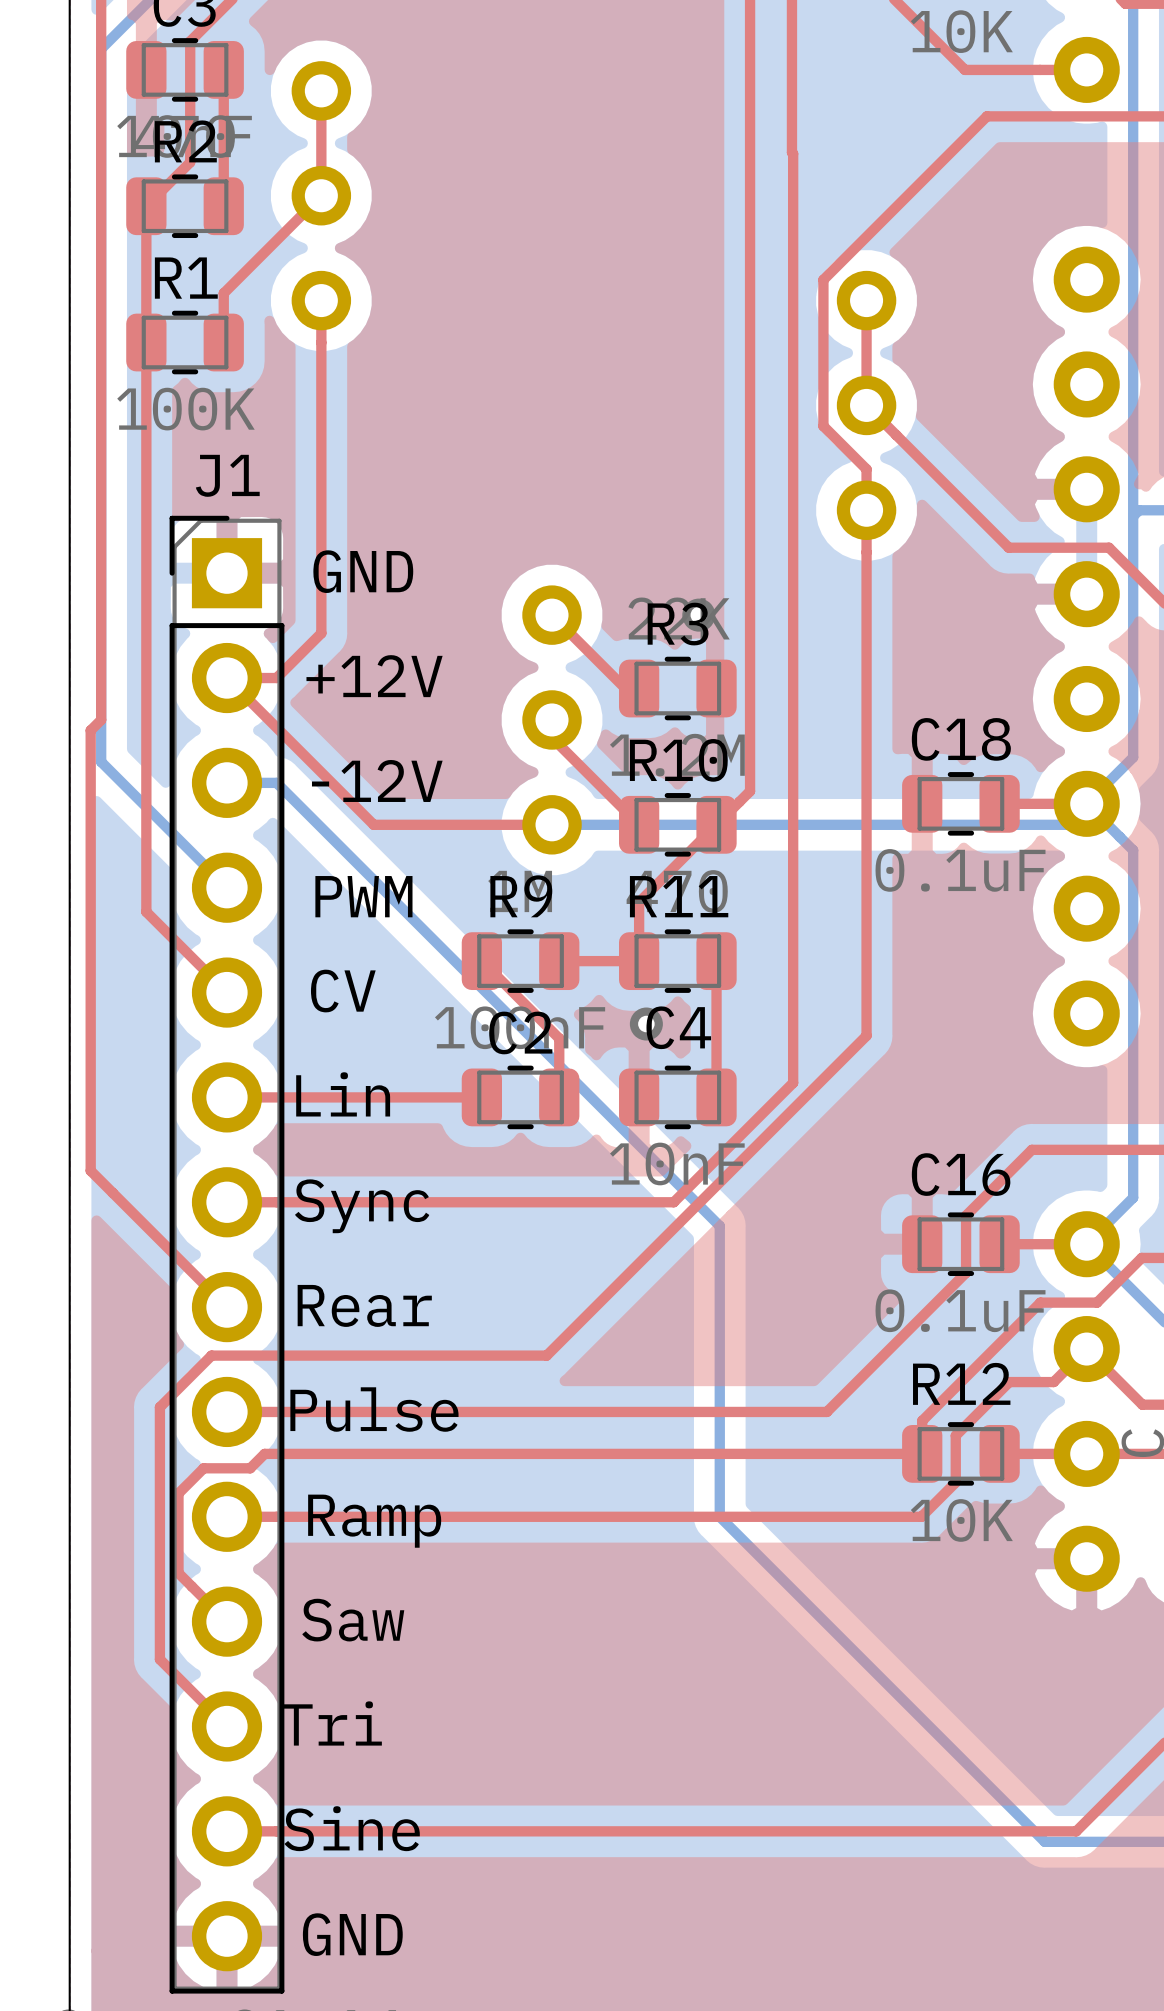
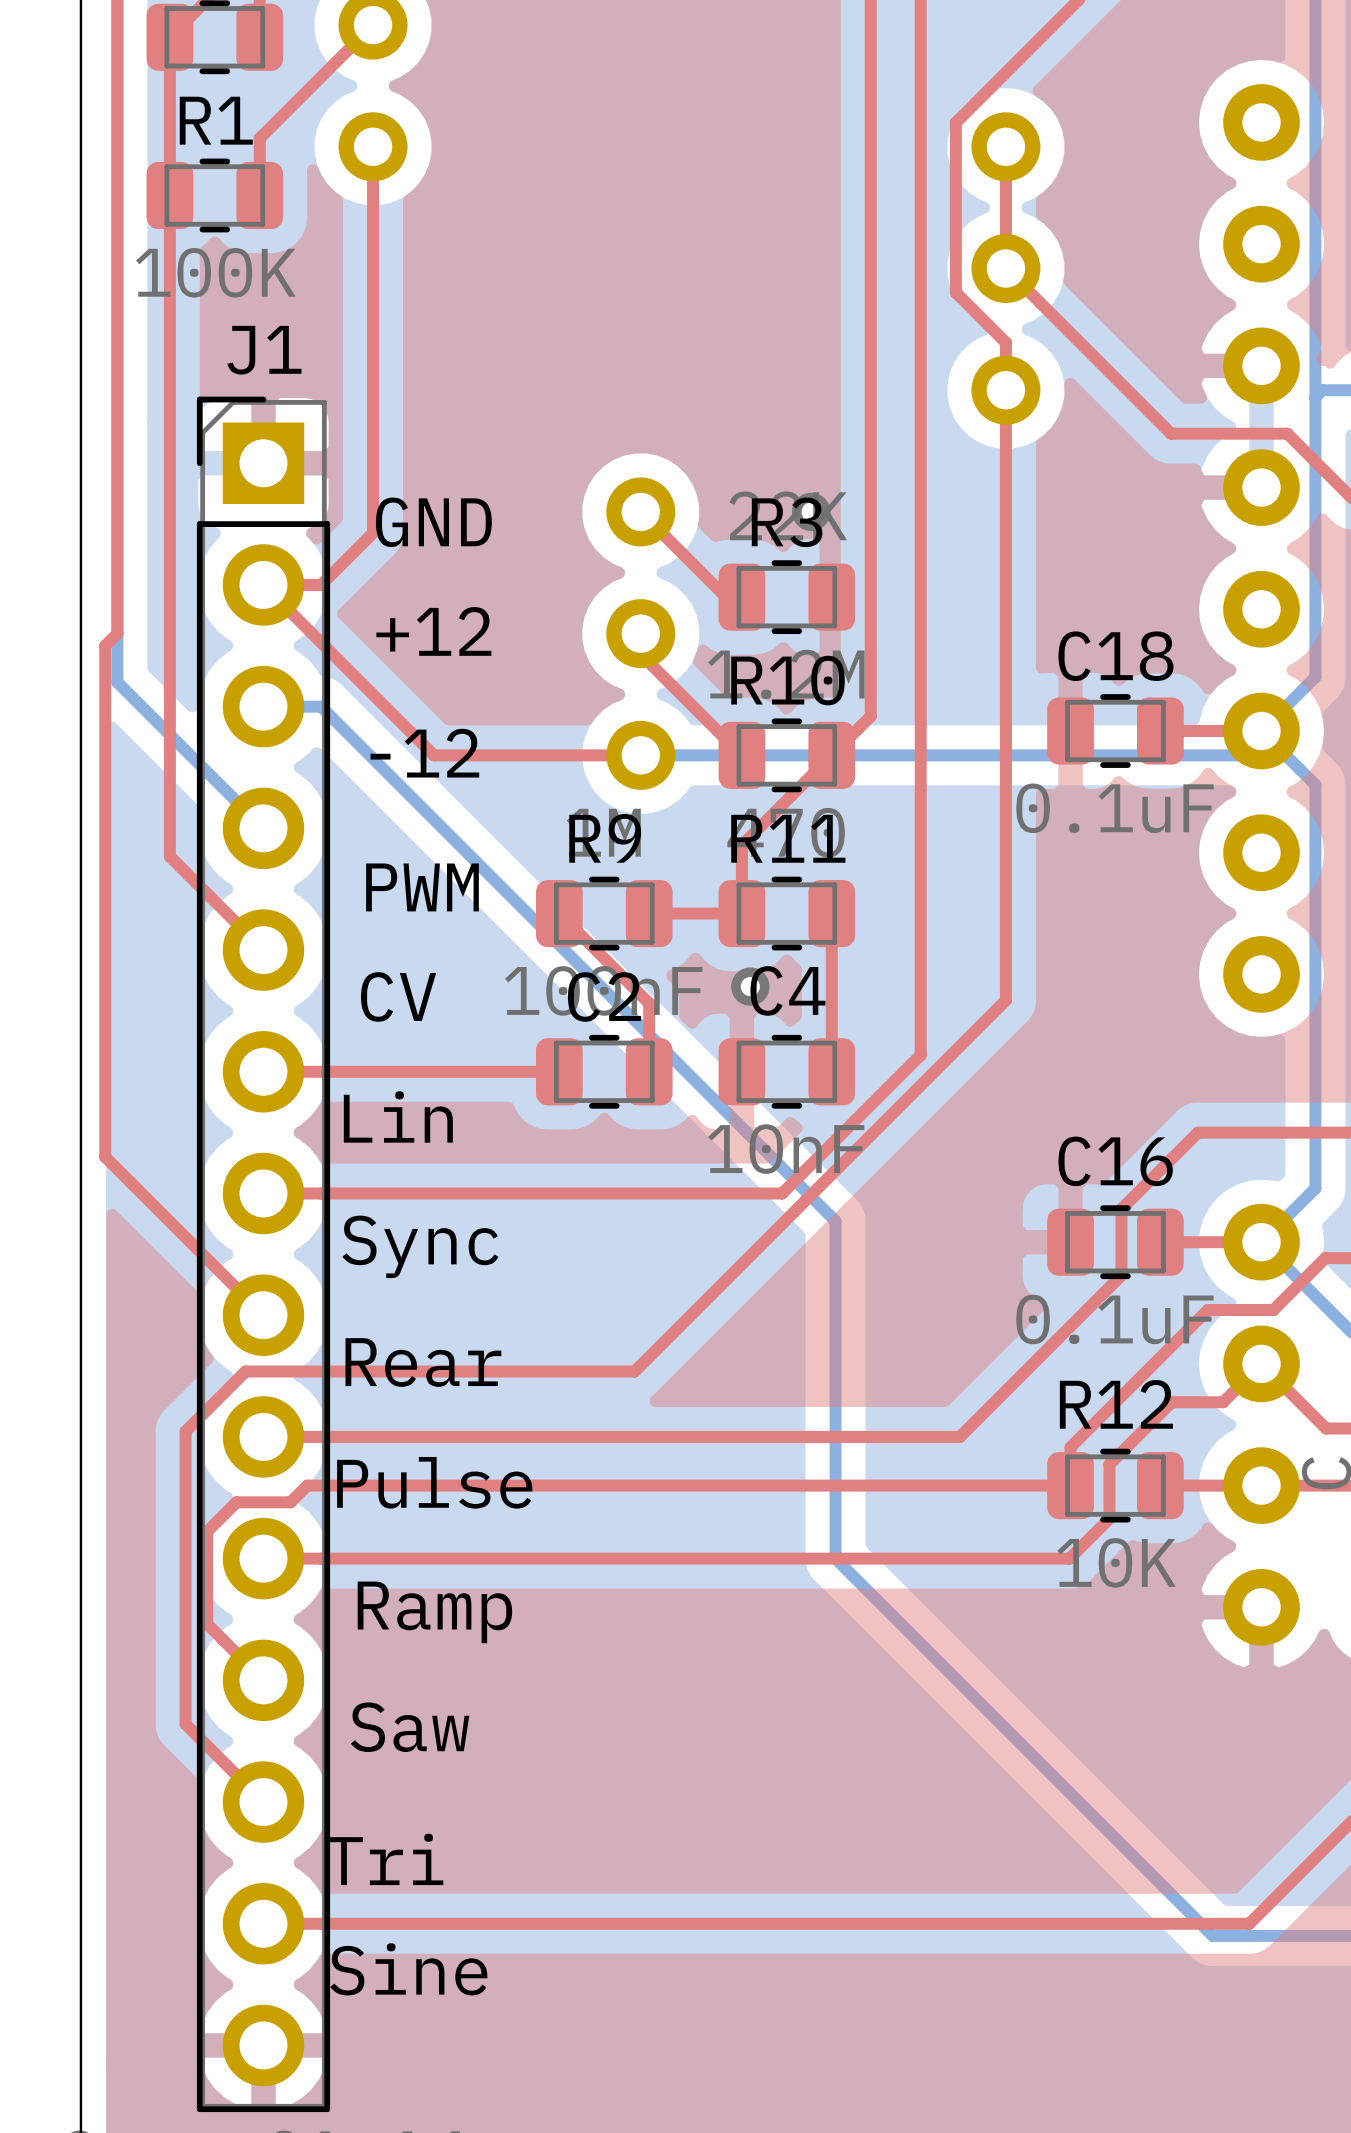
text position: GND (363, 571) -> GND (433, 522)
text: +12V (374, 676) -> +12 (433, 631)
text: -12V (377, 780) -> -12 (424, 753)
text position: PWM (363, 896) -> PWM (422, 887)
text position: CV (343, 991) -> CV (398, 996)
text position: Lin (343, 1094) -> Lin (398, 1116)
text position: Sync (362, 1206) -> Sync (420, 1246)
text position: Rear (364, 1305) -> Rear (423, 1362)
text position: Pulse (374, 1409) -> Pulse (434, 1482)
text position: Ramp (374, 1521) -> Ramp (434, 1612)
text position: Saw (353, 1620) -> Saw (410, 1727)
text position: Tri (330, 1723) -> Tri (384, 1859)
text position: Sine (352, 1828) -> Sine (408, 1969)
text: GND (352, 1934) -> none

